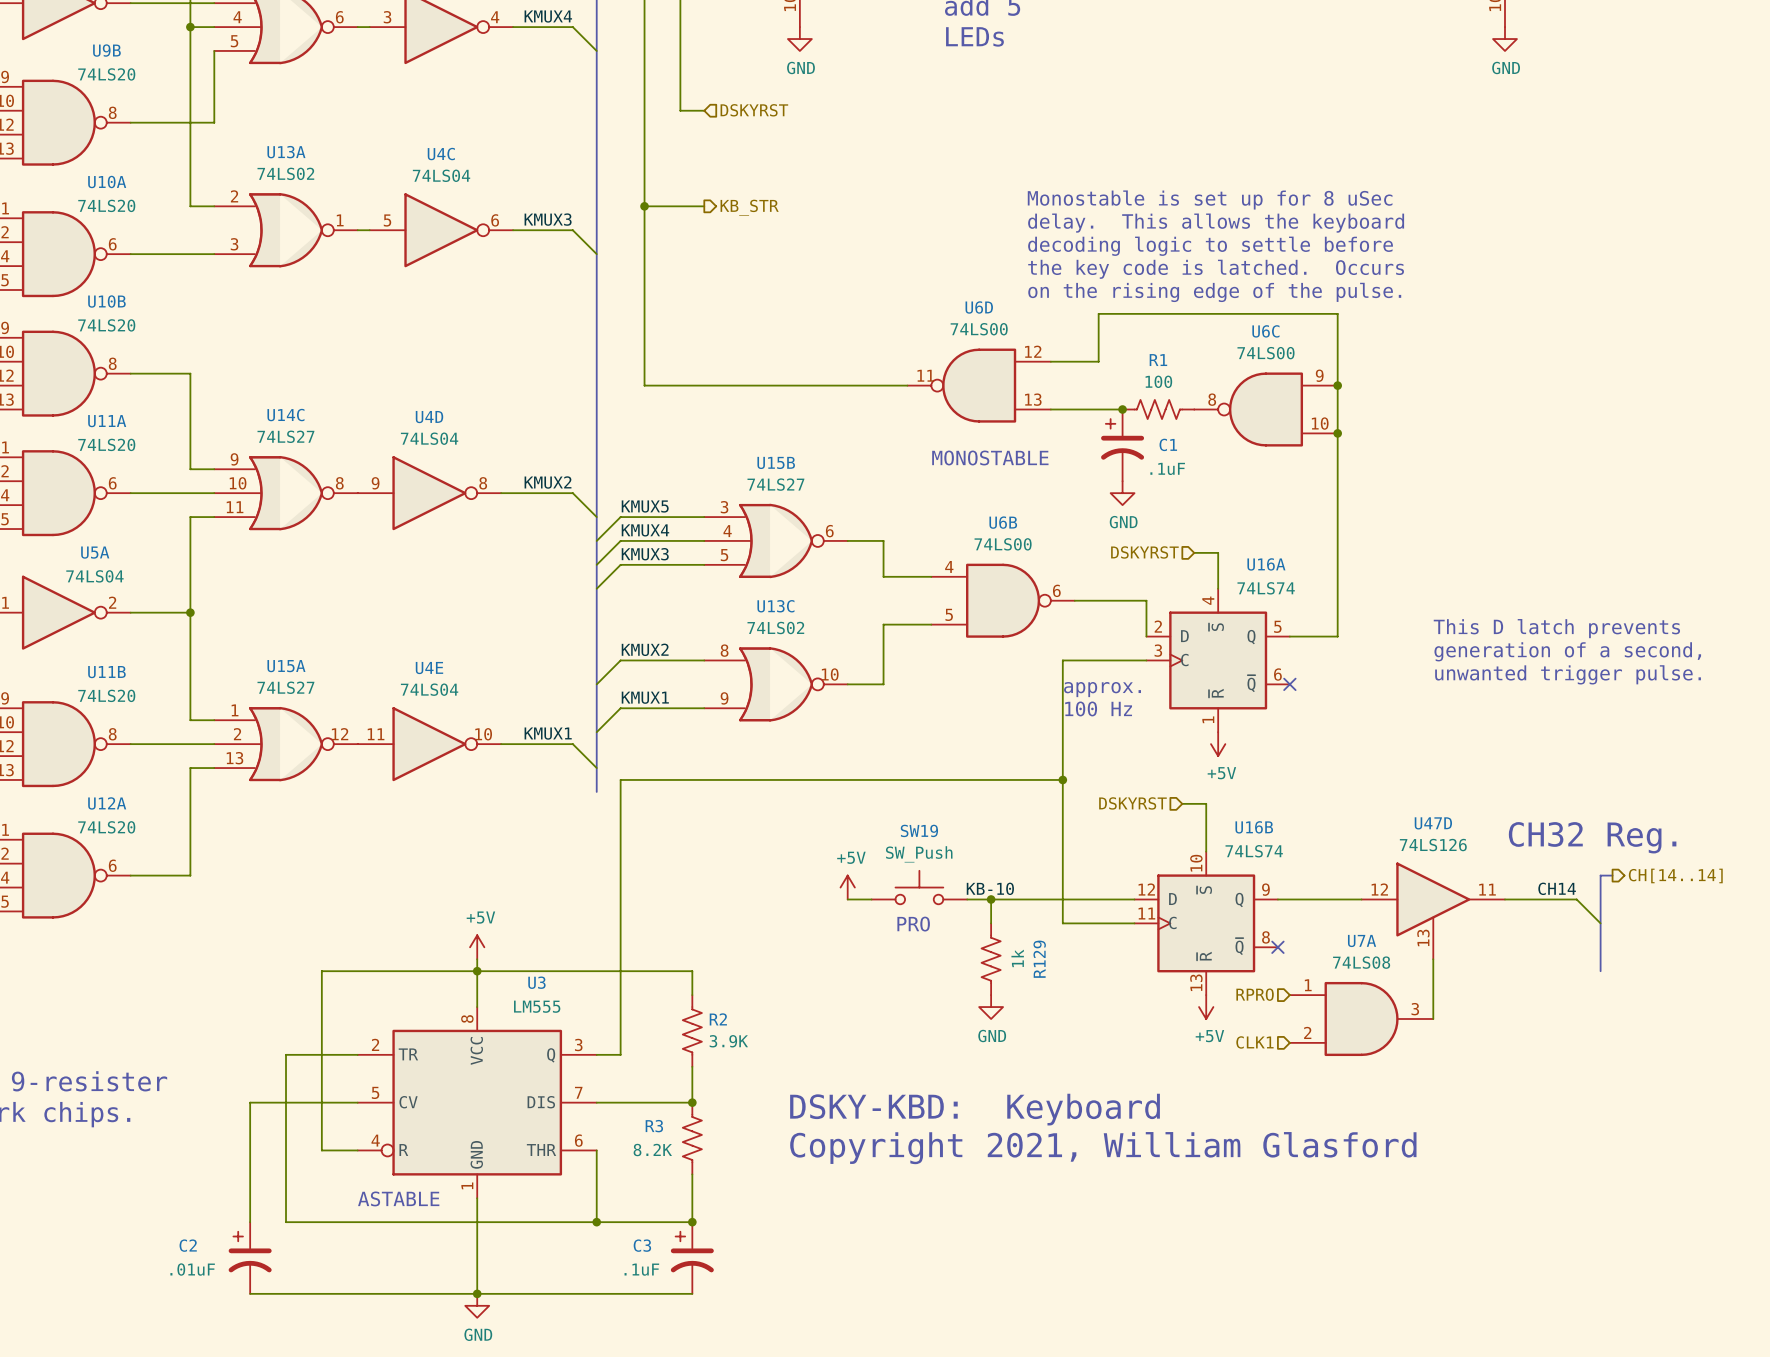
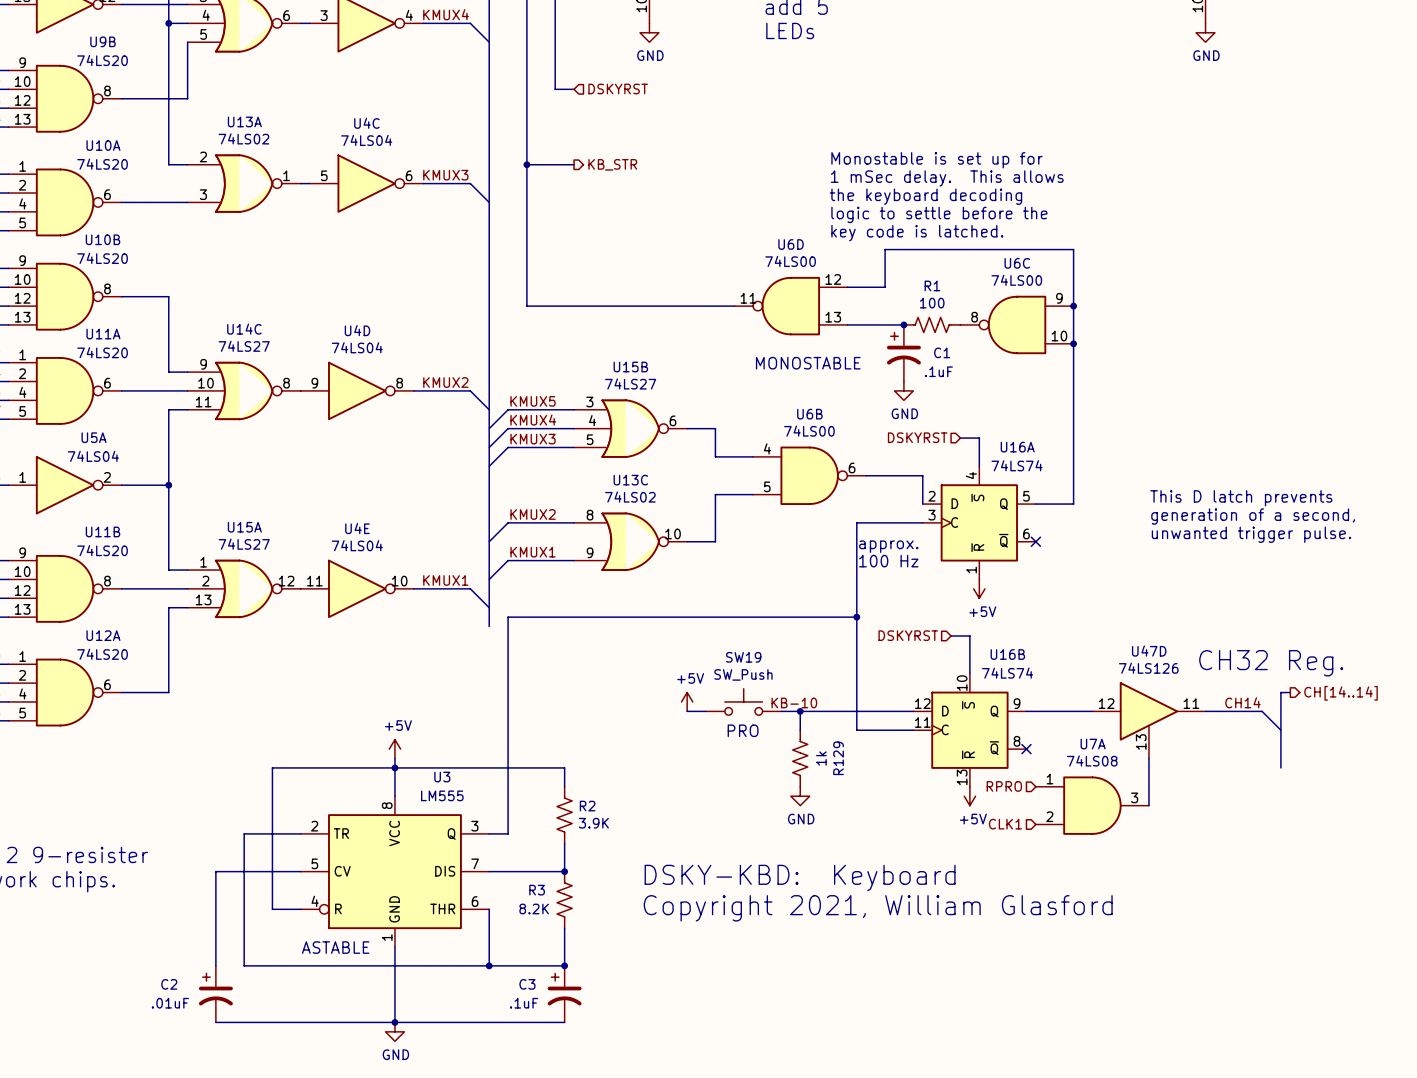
text: Monostable is set up for 8 uSec (1210, 200) -> Monostable is set up for (936, 160)
text: delay. This allows the keyboard (1216, 223) -> 1 mSec delay. This allows (947, 178)
text: decoding logic to settle before (1210, 246) -> the keyboard decoding (925, 196)
text: the key code is latched. Occurs (1216, 269) -> logic to settle before the (939, 214)
text: on the rising edge of the pulse. (1214, 292) -> key code is latched. (917, 233)

